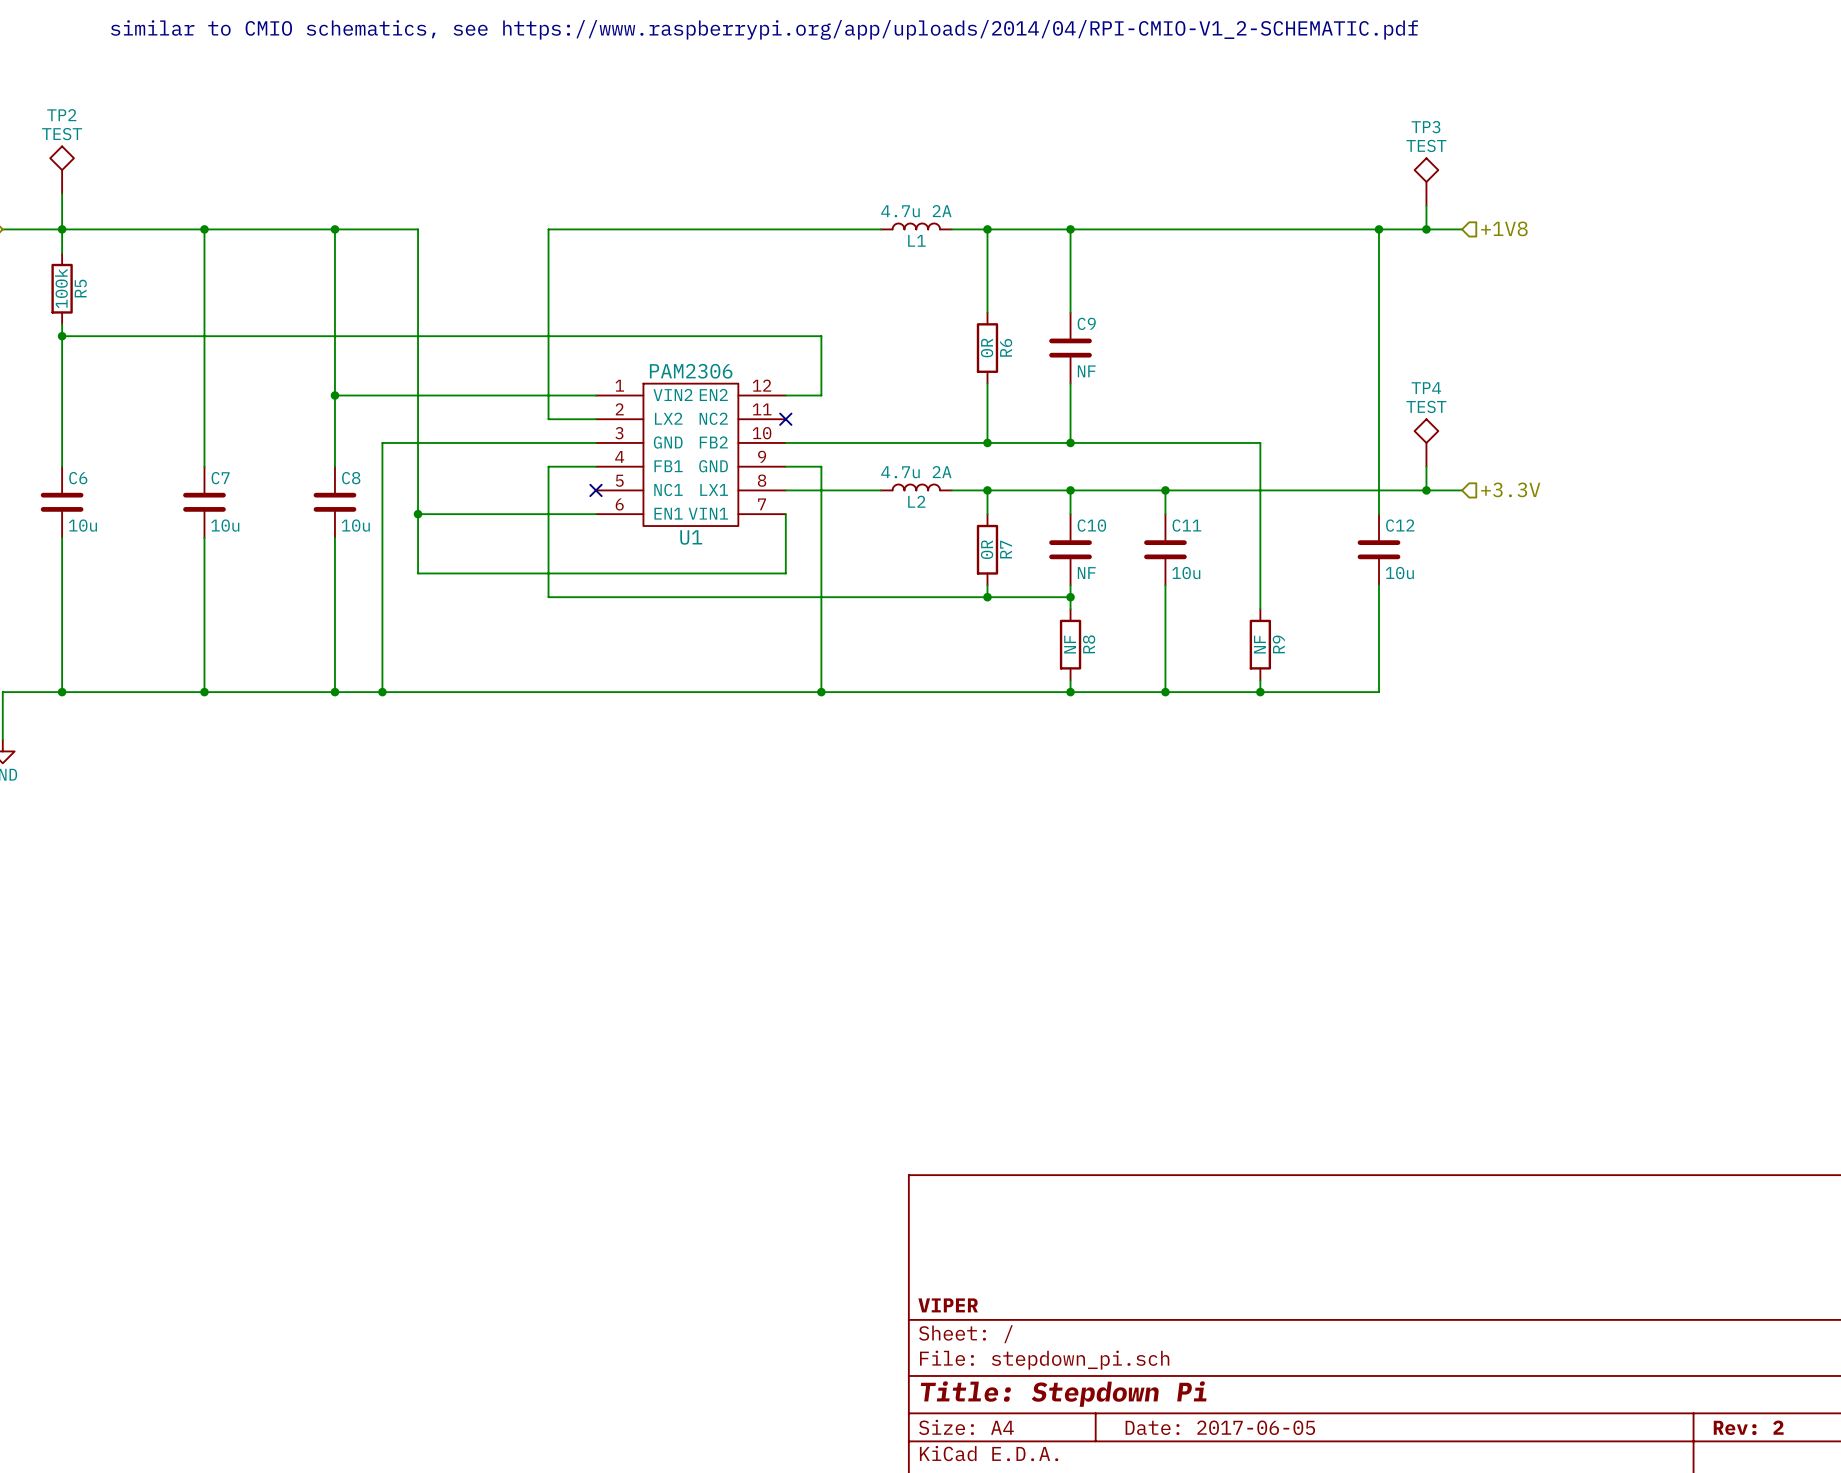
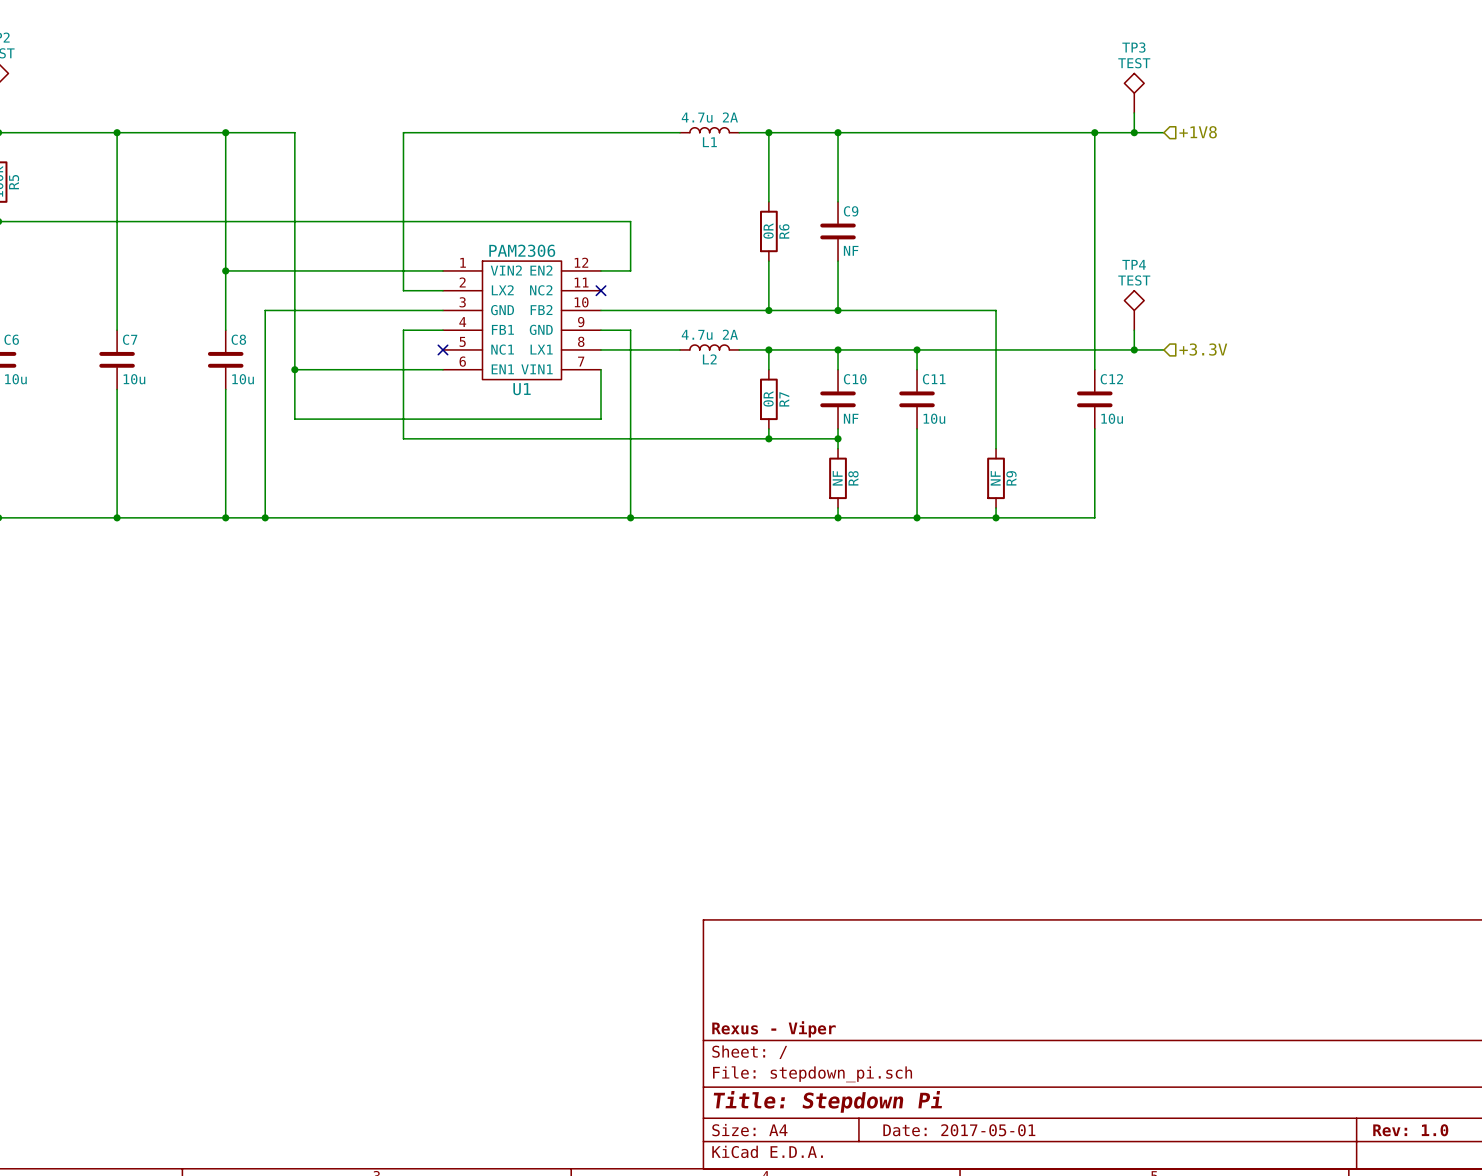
title block: VIPER (948, 1305) -> Rexus - Viper (774, 1029)
title block: Date: 2017-06-05 (1220, 1427) -> Date: 2017-05-01 (959, 1130)
title block: Rev: 2 (1748, 1427) -> Rev: 1.0 (1410, 1130)

